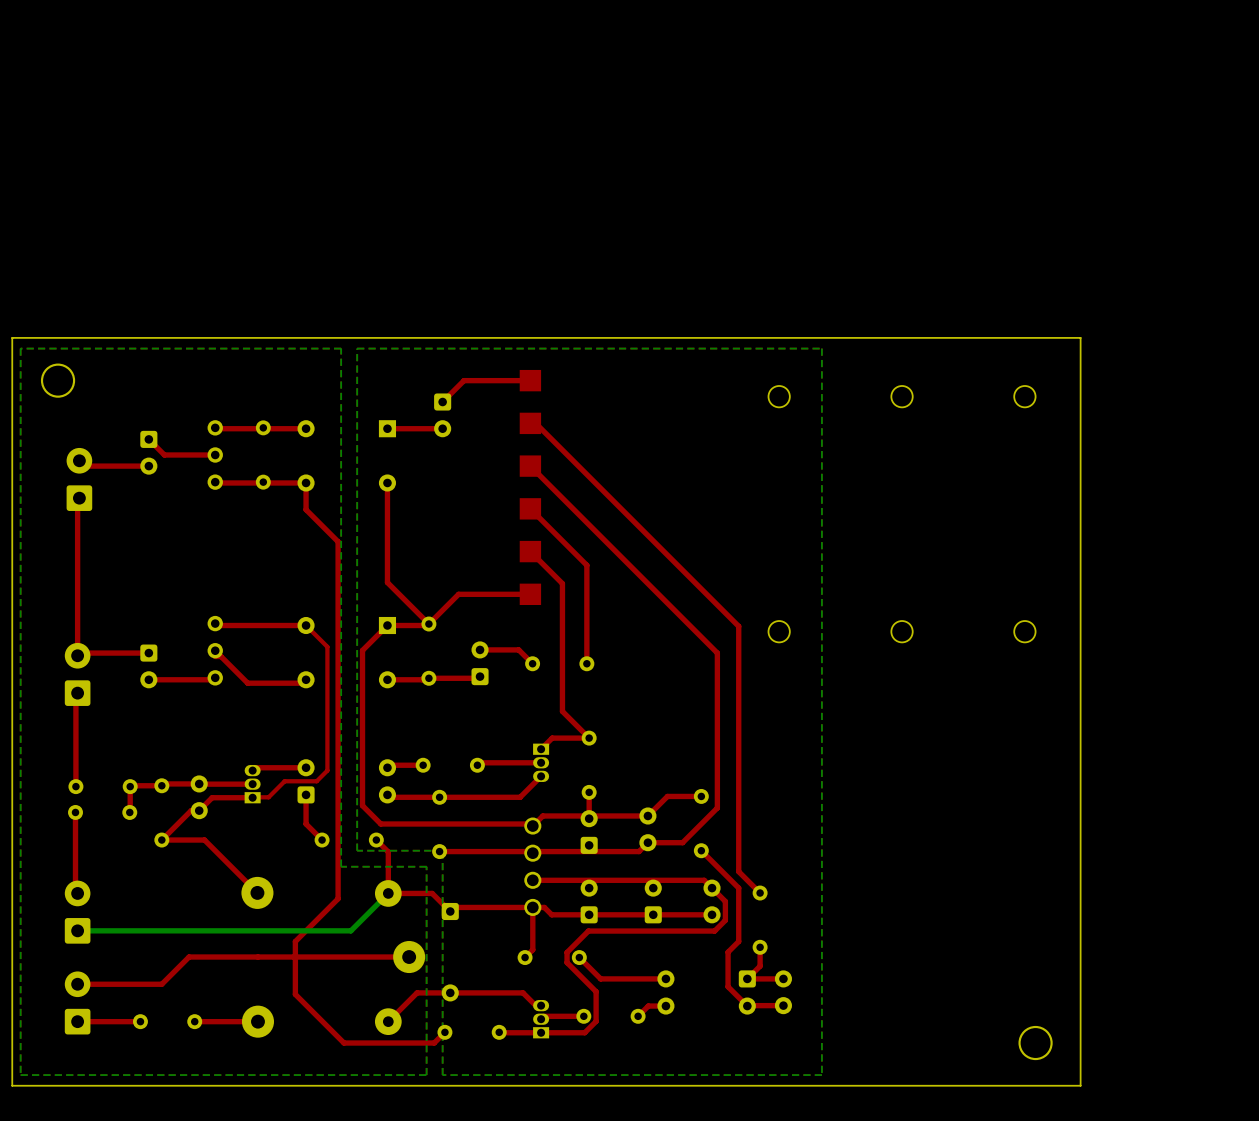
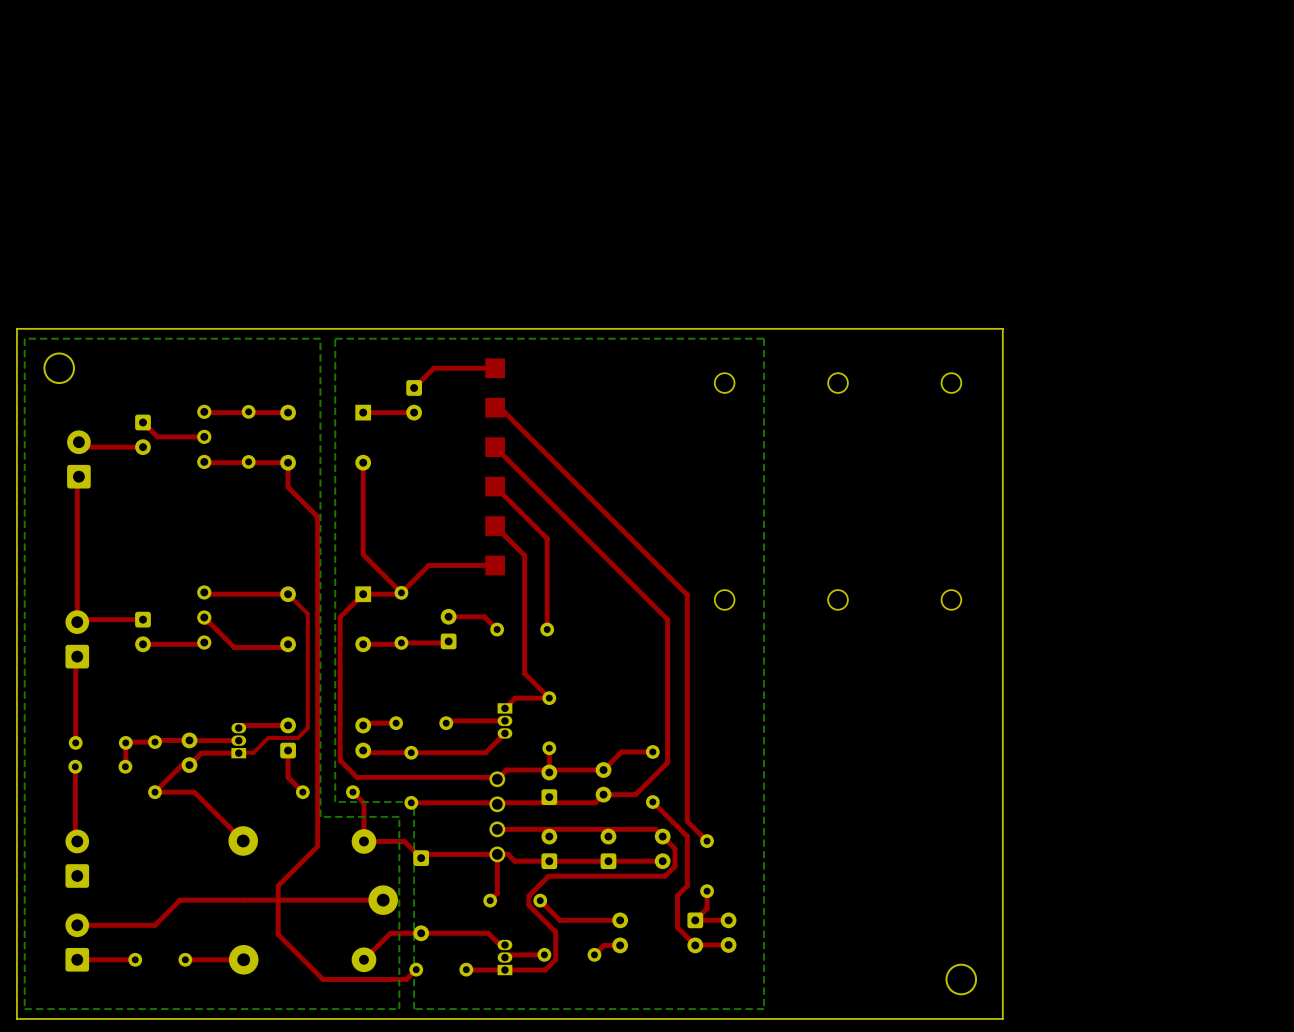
bottom track: (388, 893) (350, 930) (77, 930) -> none

